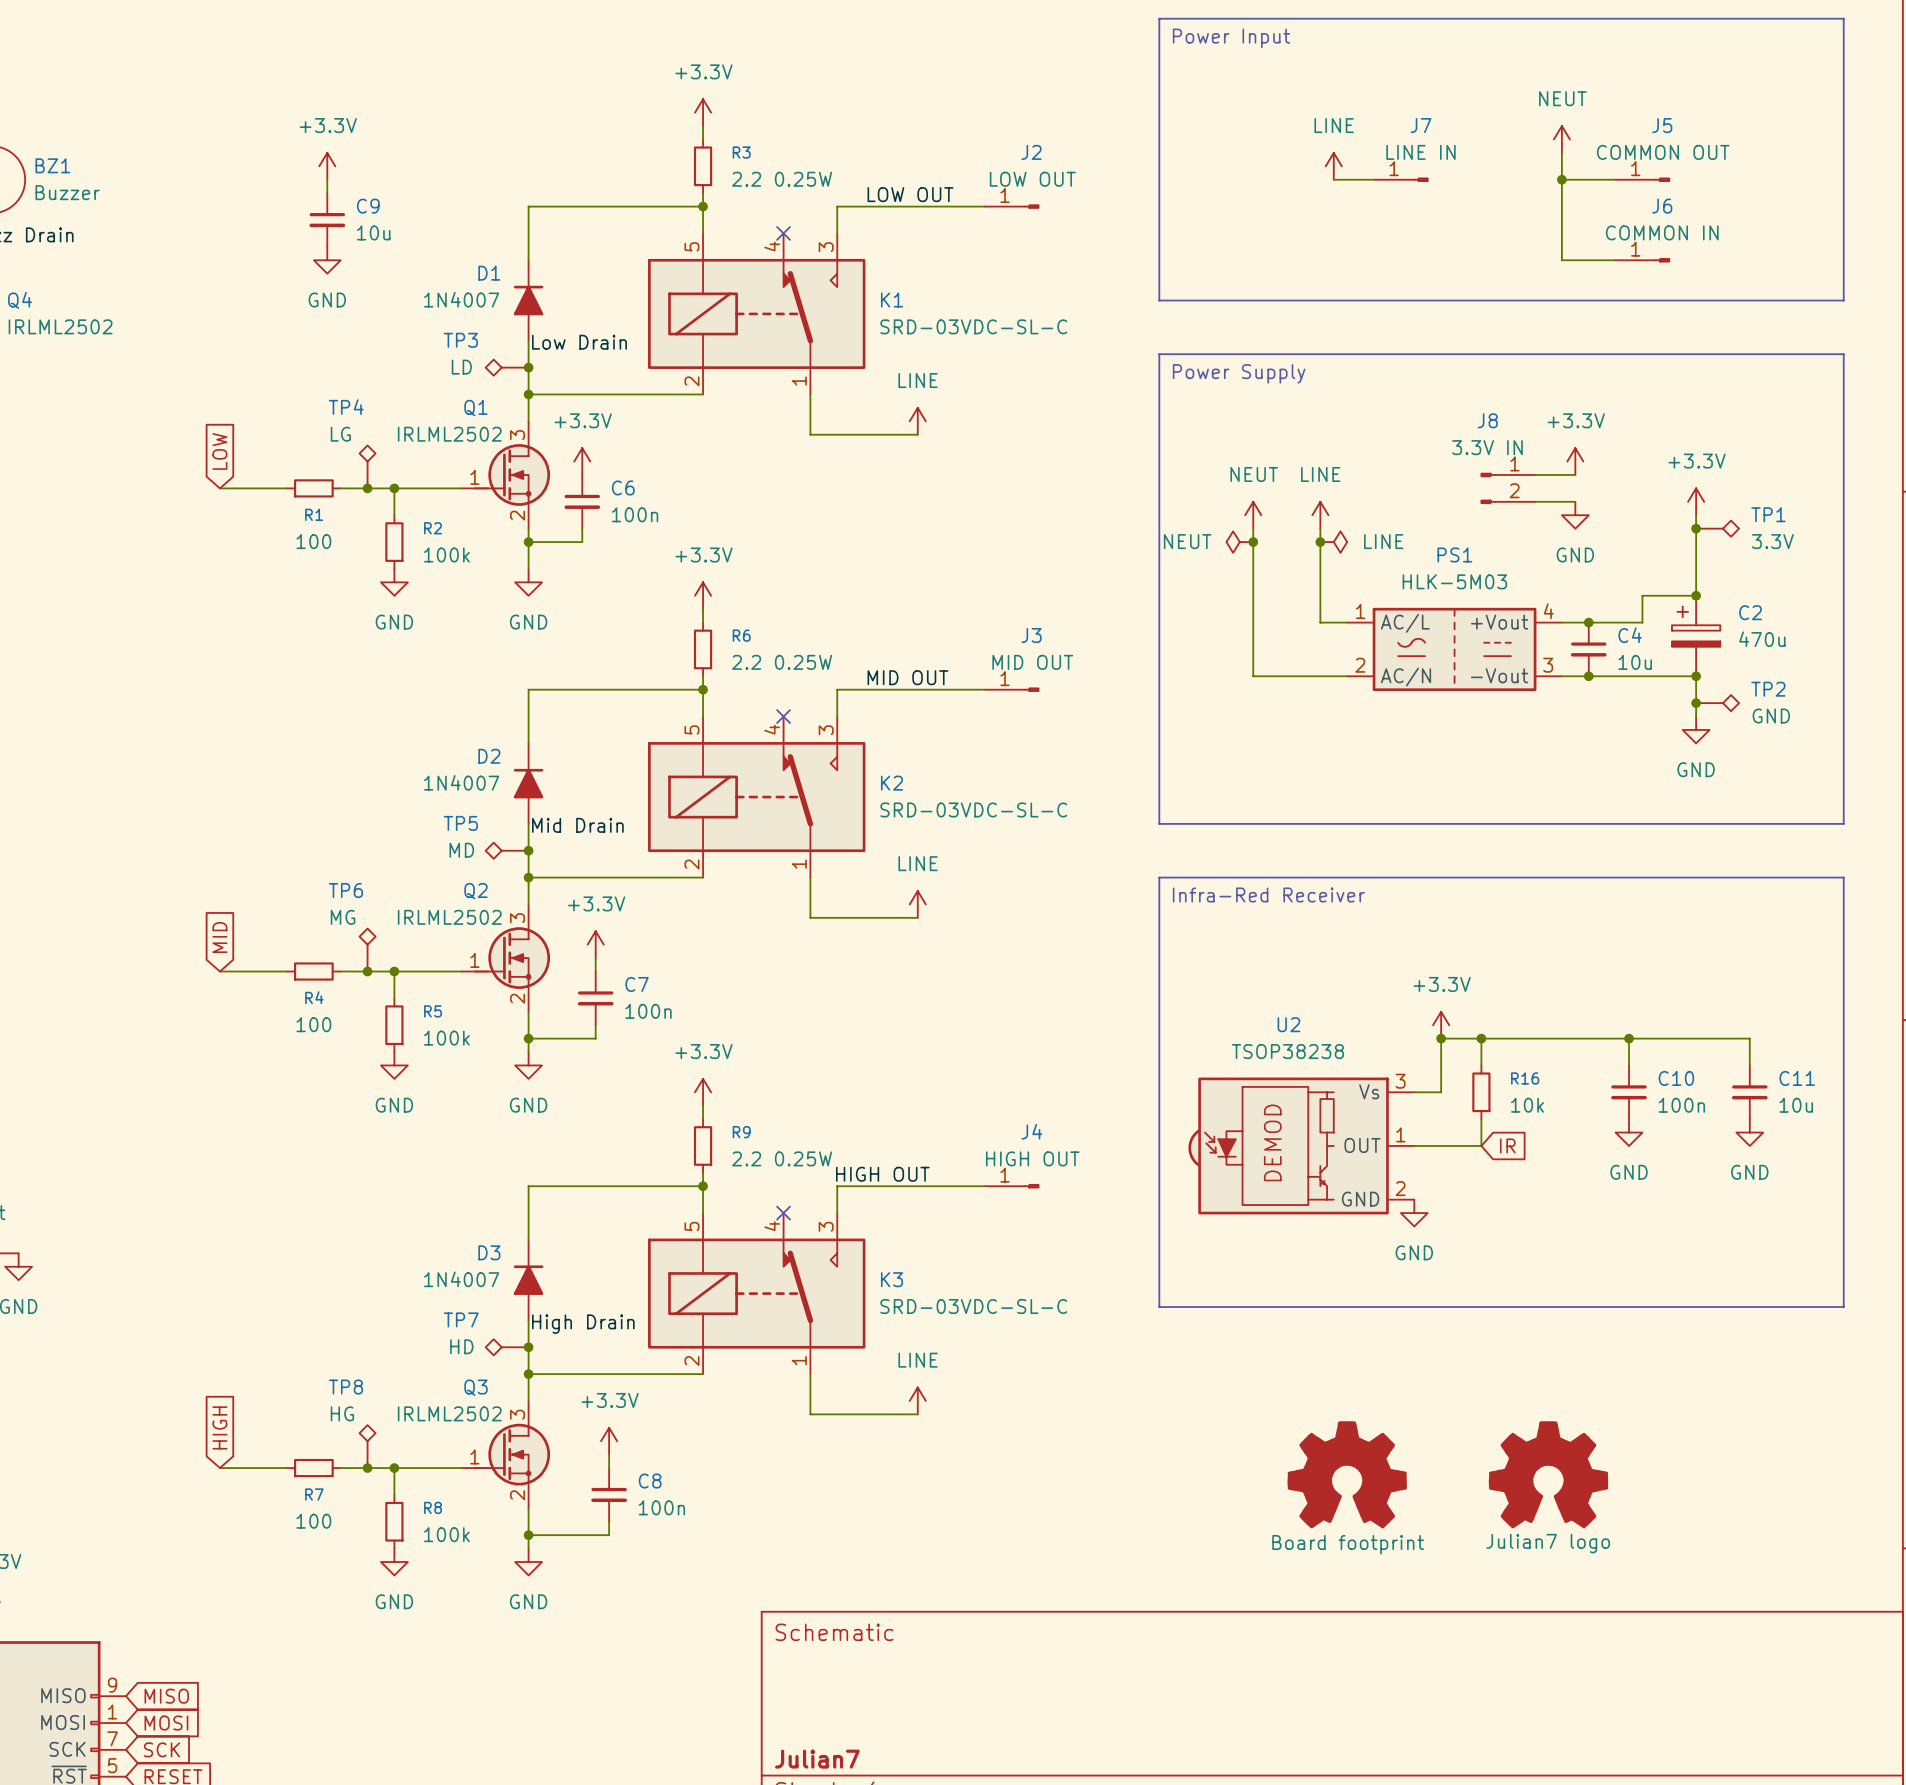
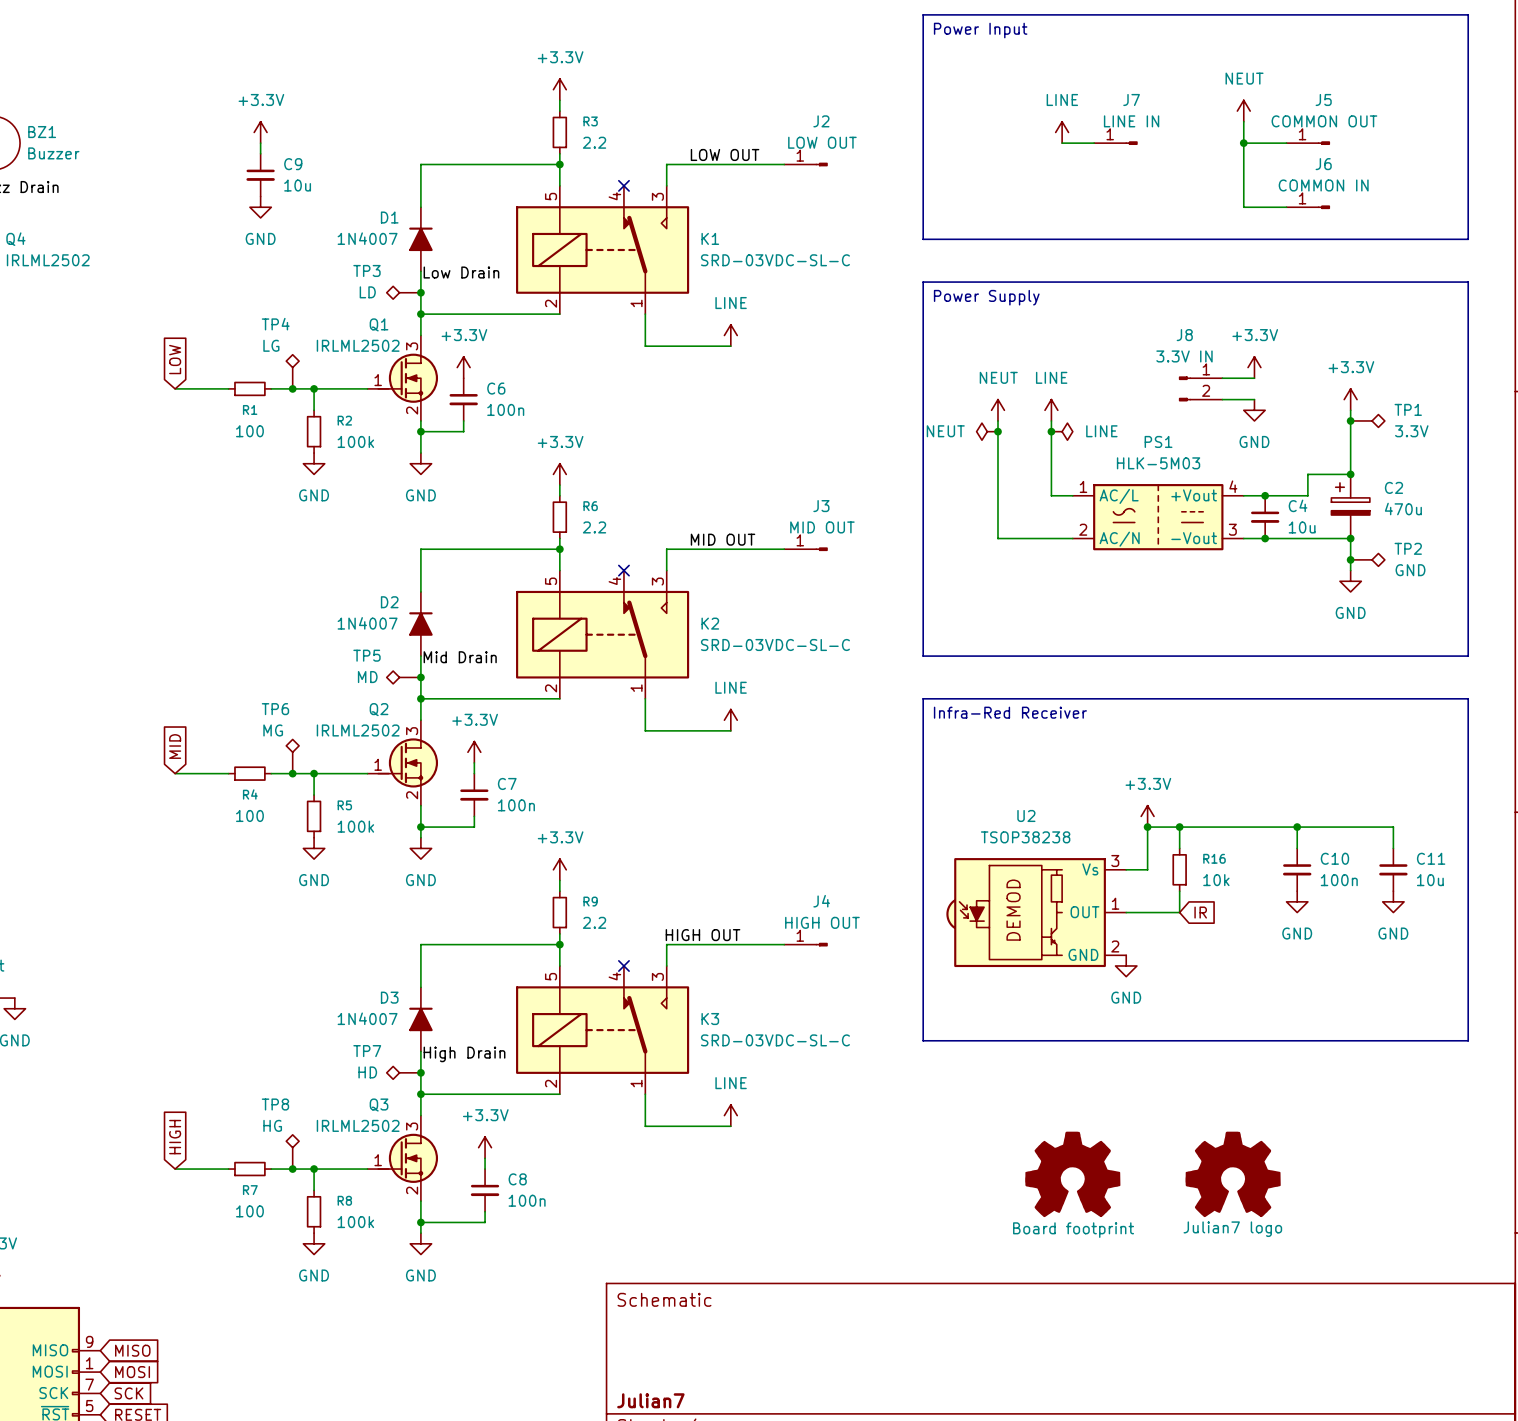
R3 value: 2.2 0.25W (782, 179) -> 2.2 (594, 142)
R6 value: 2.2 0.25W (782, 662) -> 2.2 (594, 527)
R9 value: 2.2 0.25W (782, 1158) -> 2.2 (594, 922)

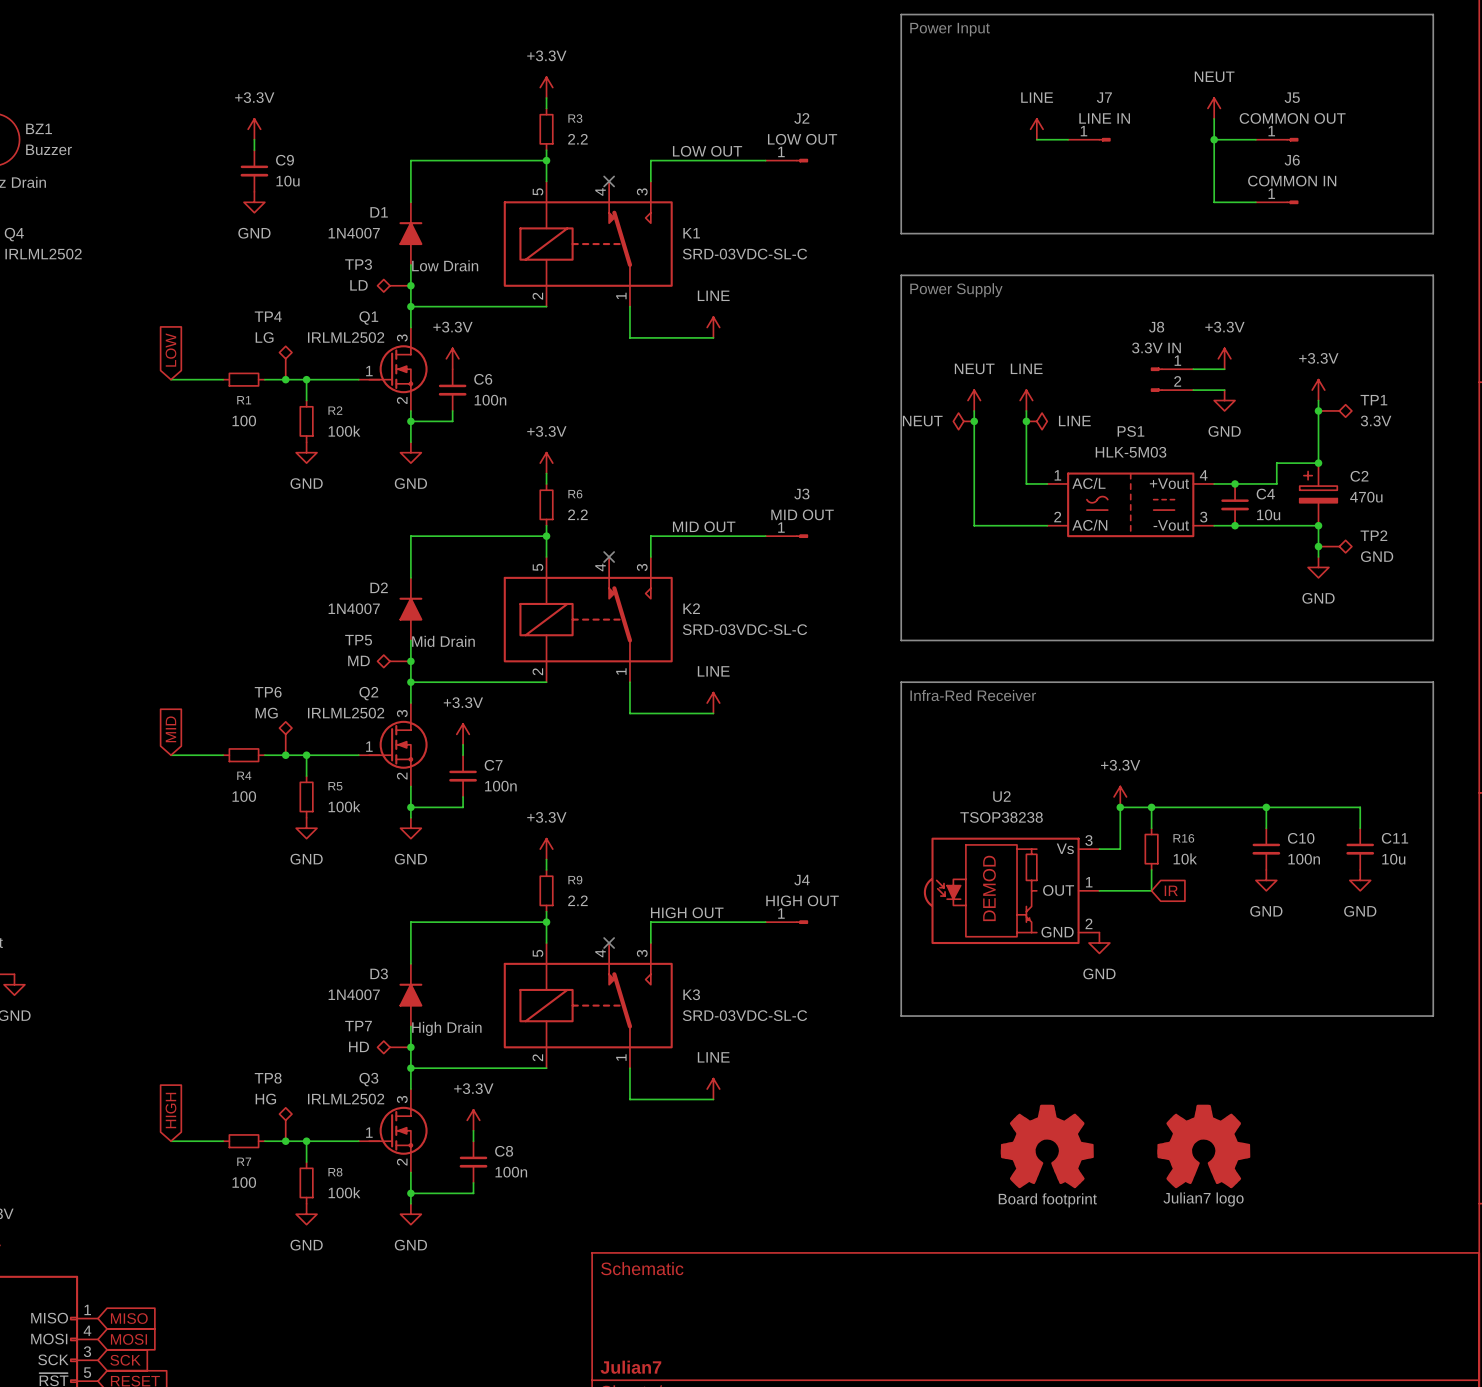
part pin number: 9 (89, 1341) -> 1 (87, 1309)
part pin number: 1 (89, 1363) -> 4 (87, 1330)
part pin number: 7 (89, 1384) -> 3 (87, 1351)

